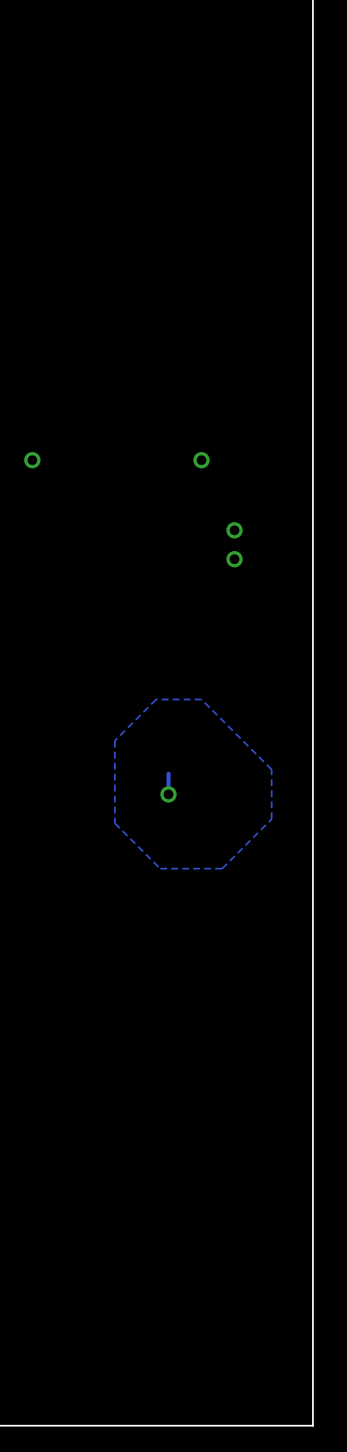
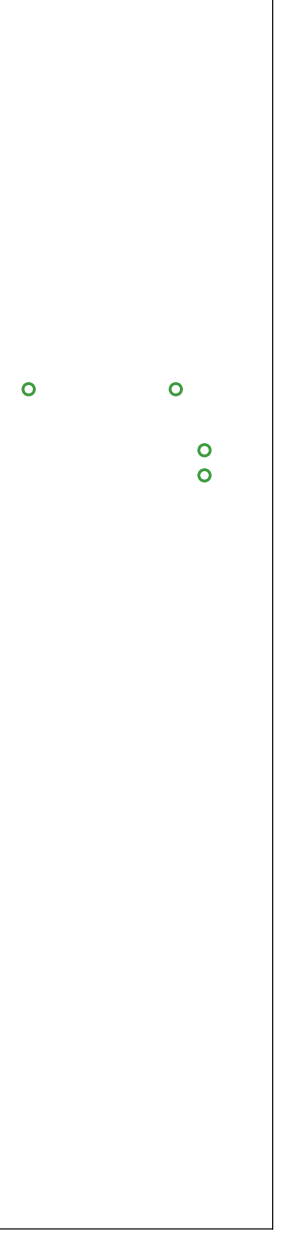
zone outline: (201, 699) (271, 769) (271, 819) (222, 868) (160, 868) (114, 823) (114, 740) (156, 699) (201, 699) -> none
track: (168, 773) (168, 794) -> none
via: (168, 794) -> none

